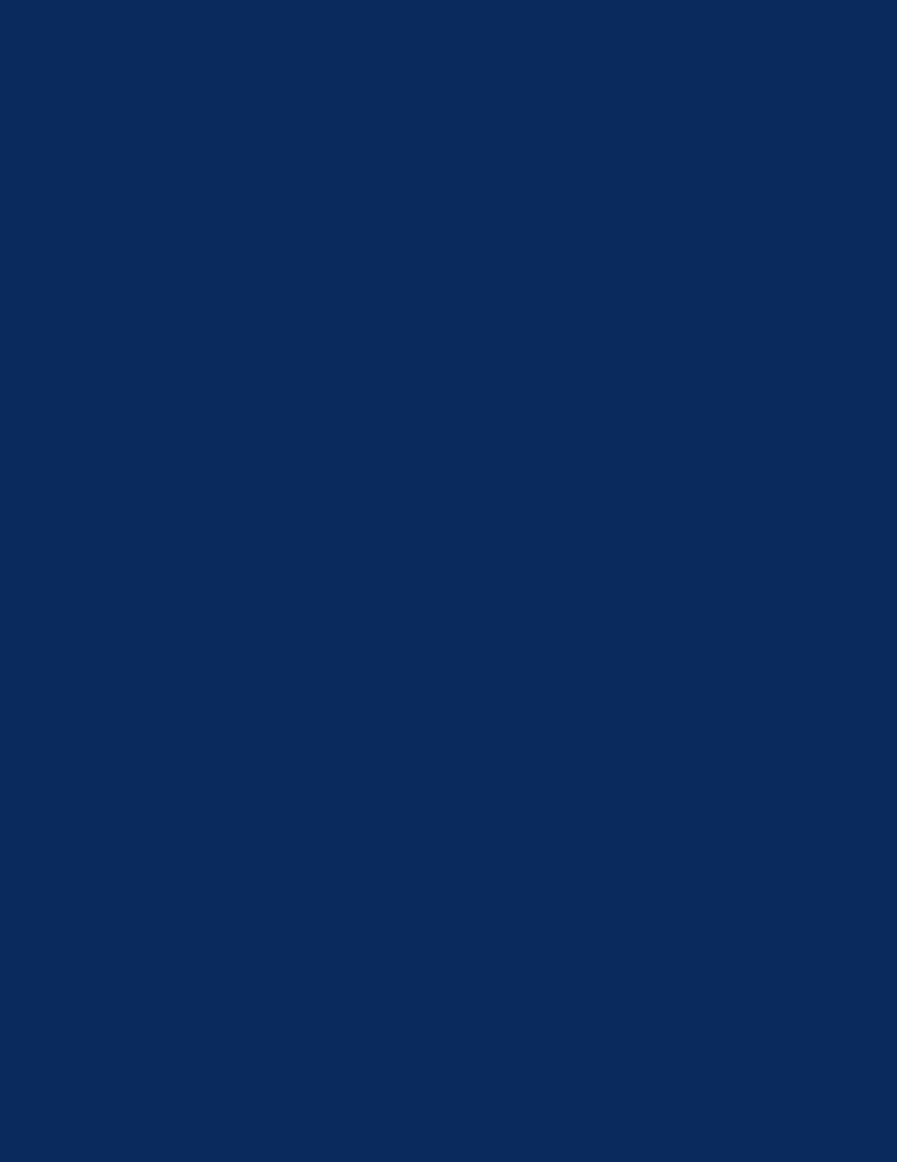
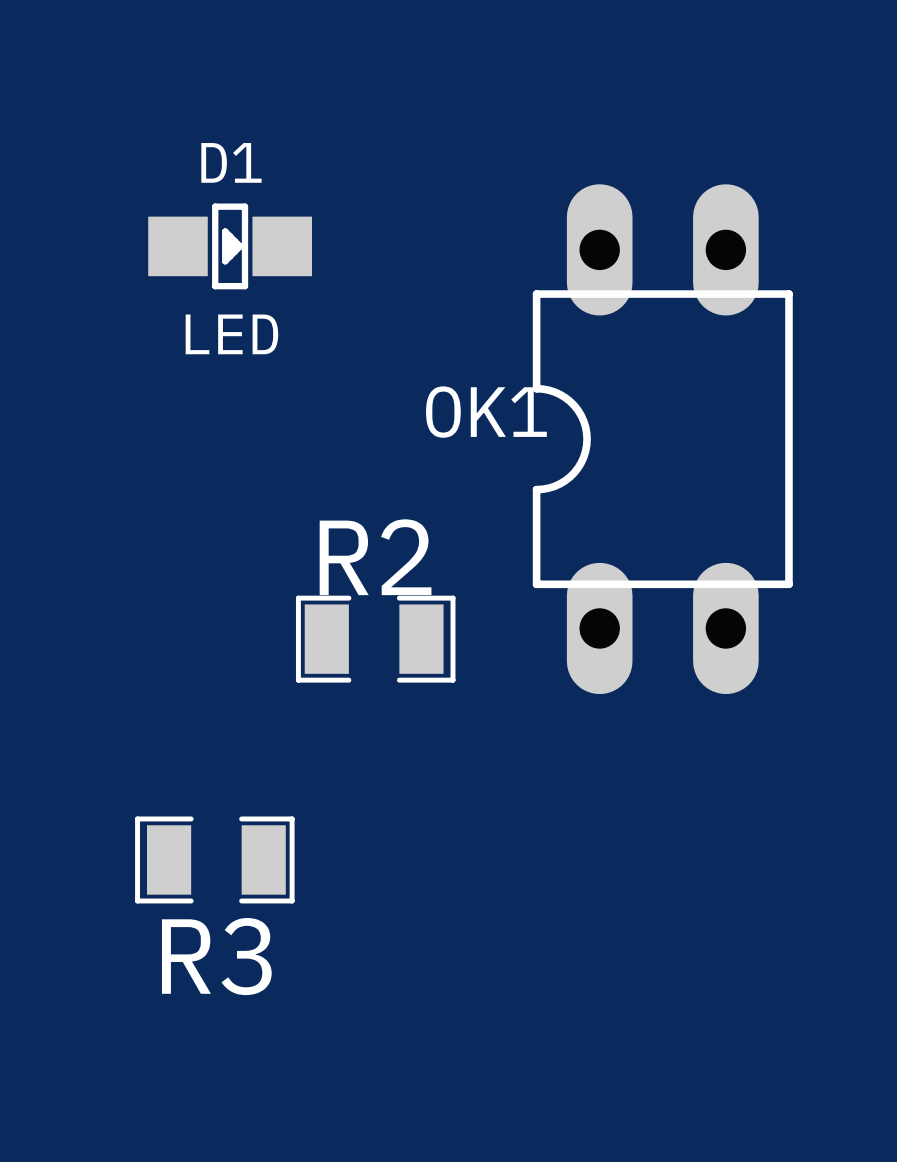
D1: none -> LED (230, 246)
OK1: none -> (662, 439)
R2: none -> (375, 639)
R3: none -> (214, 859)

